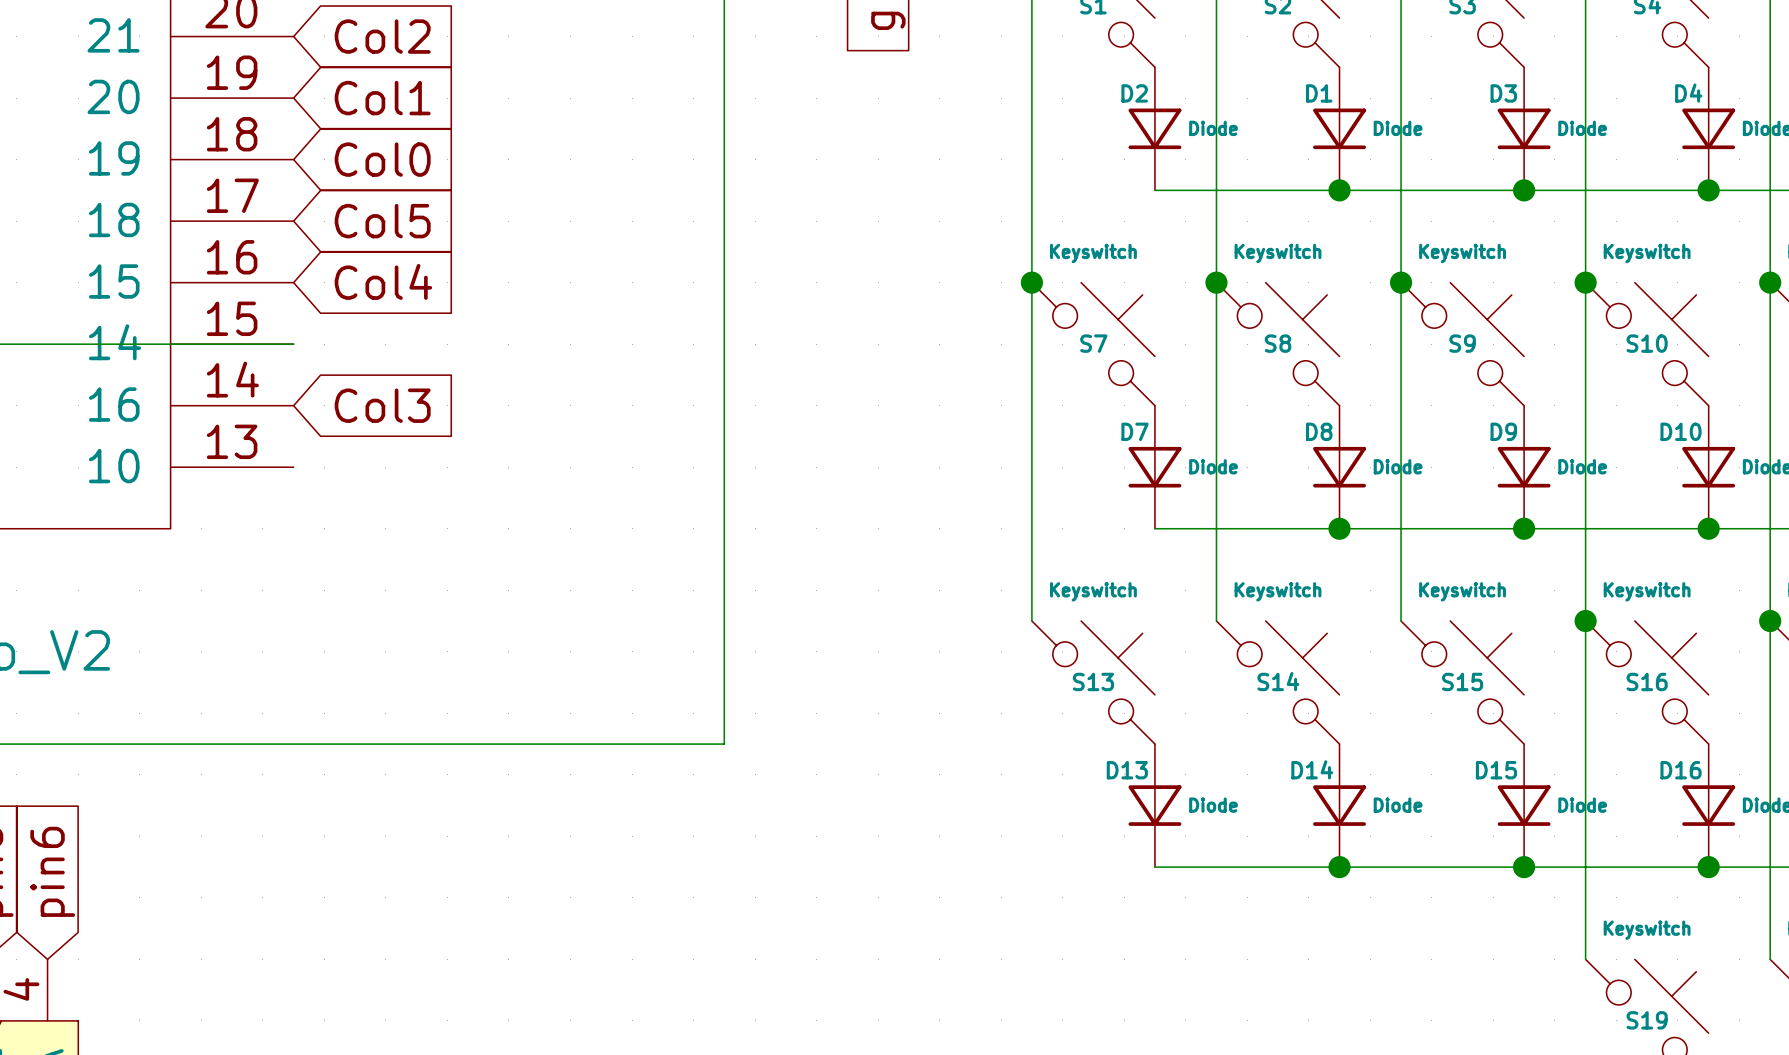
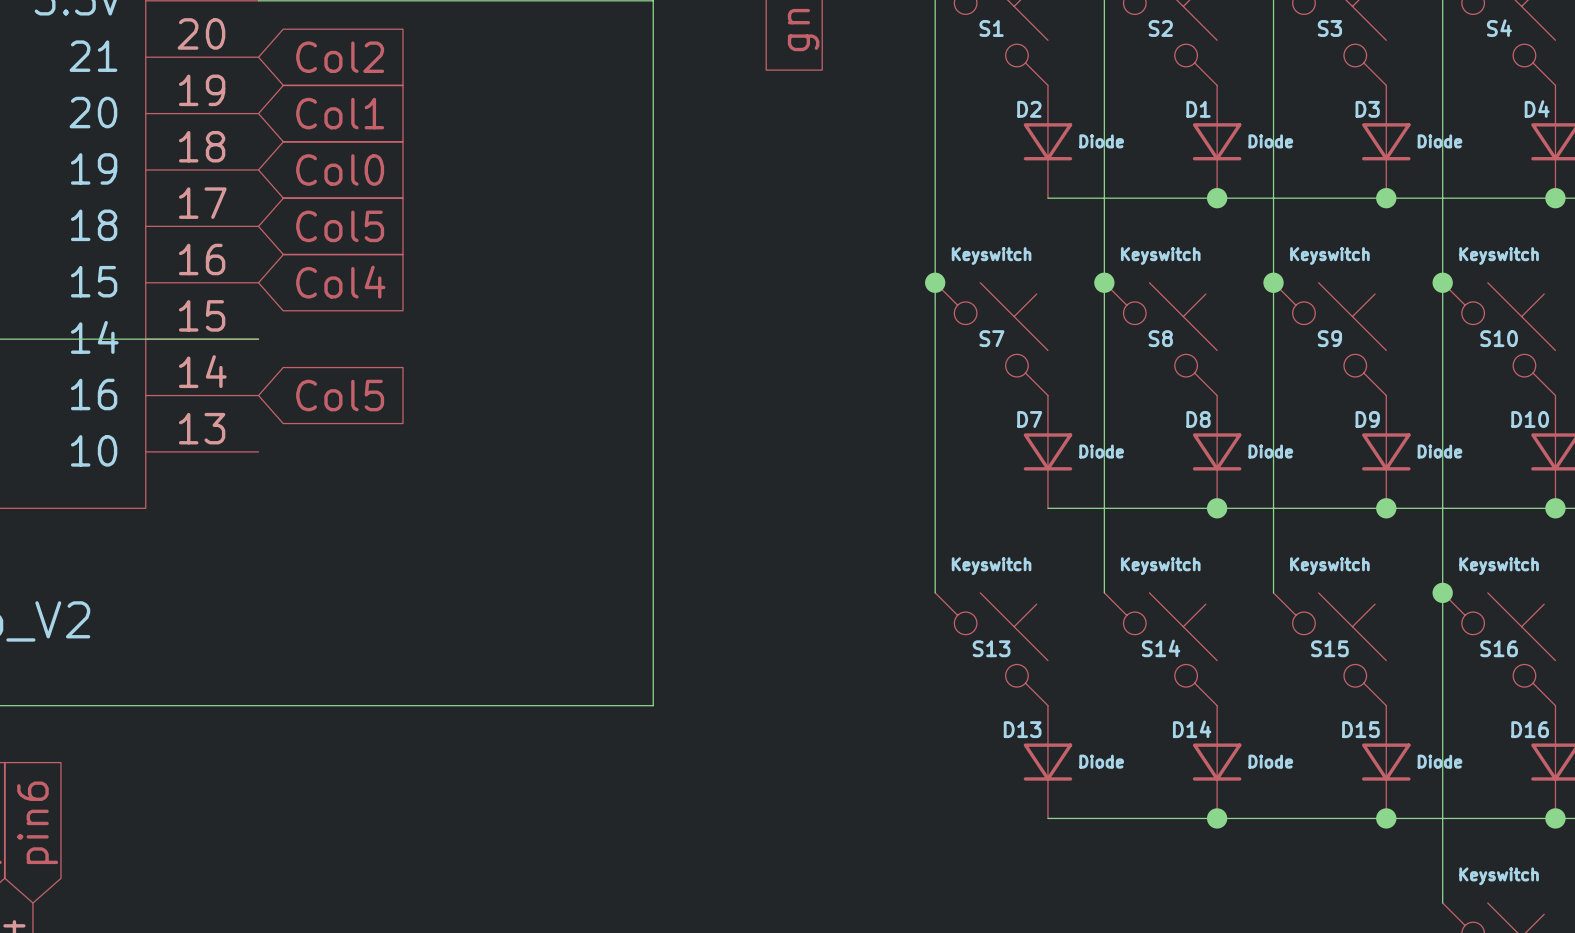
global label: Col3 (382, 405) -> Col5 (340, 395)

